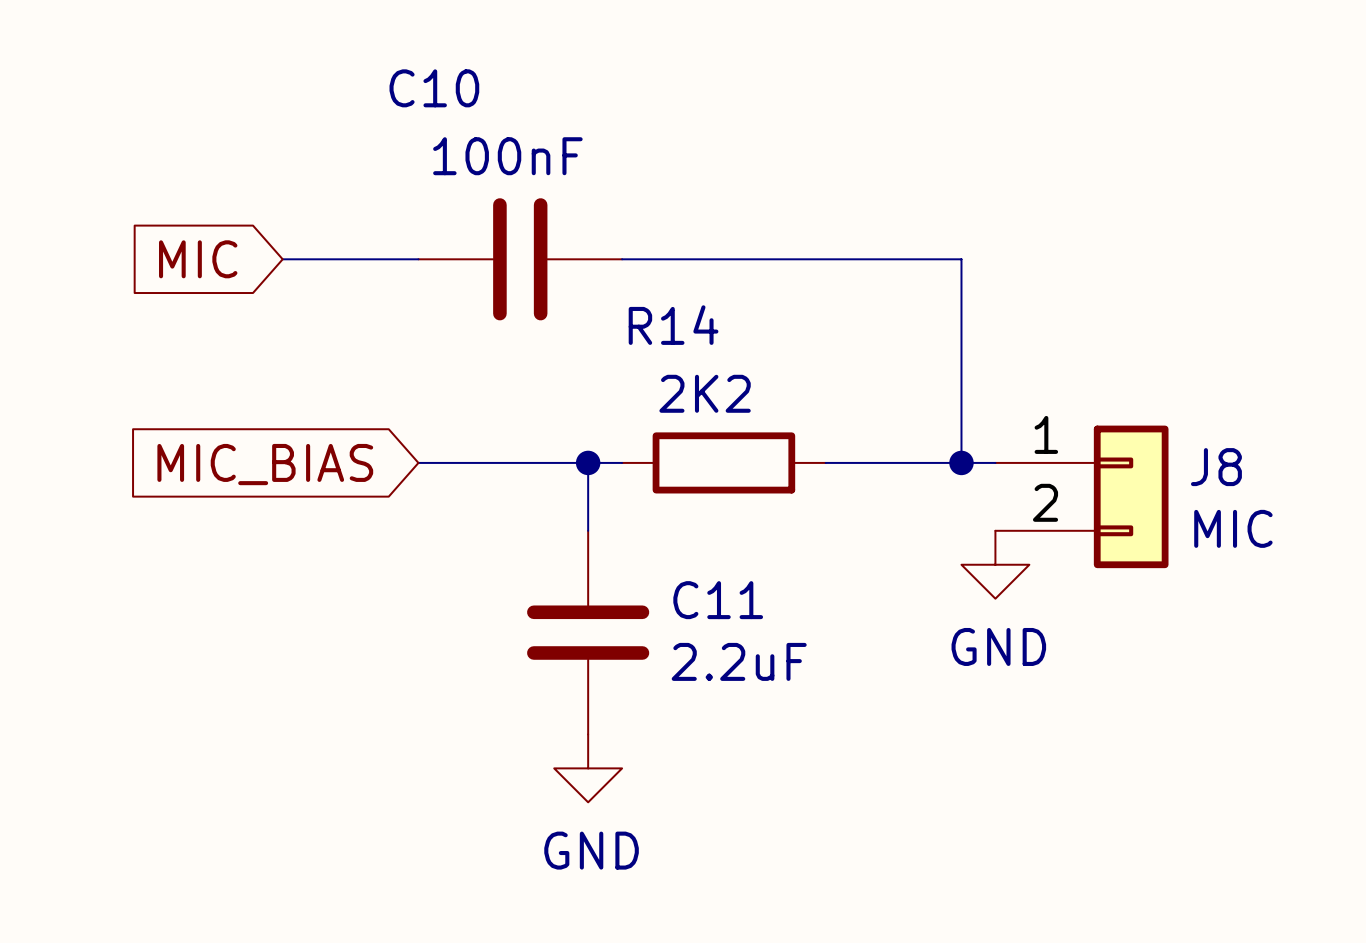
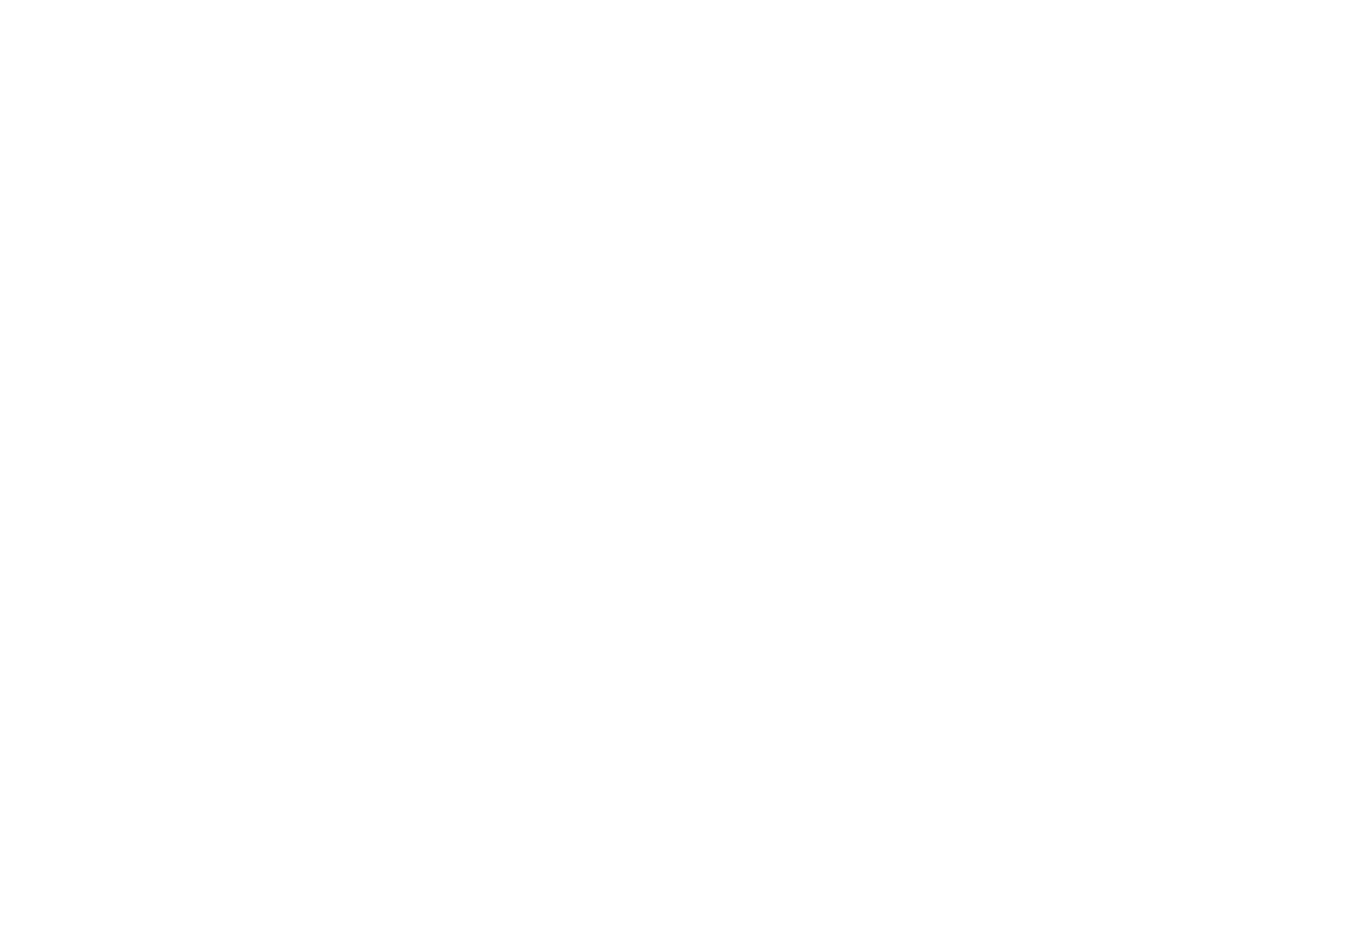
global label: MIC (198, 259) -> none
wire: (282, 259) (418, 259) -> none
C10: 100nF (520, 259) -> none
wire: (622, 259) (961, 259) (961, 462) -> none
wire: (418, 462) (622, 462) -> none
wire: (588, 462) (588, 530) -> none
junction: (588, 462) -> none
R14: 2K2 (723, 462) -> none
wire: (825, 462) (995, 462) -> none
junction: (961, 462) -> none
global label: MIC_BIAS (265, 464) -> none
J8: MIC (1081, 496) -> none
power symbol: GND (995, 564) -> none
C11: 2.2uF (588, 632) -> none
power symbol: GND (588, 768) -> none

